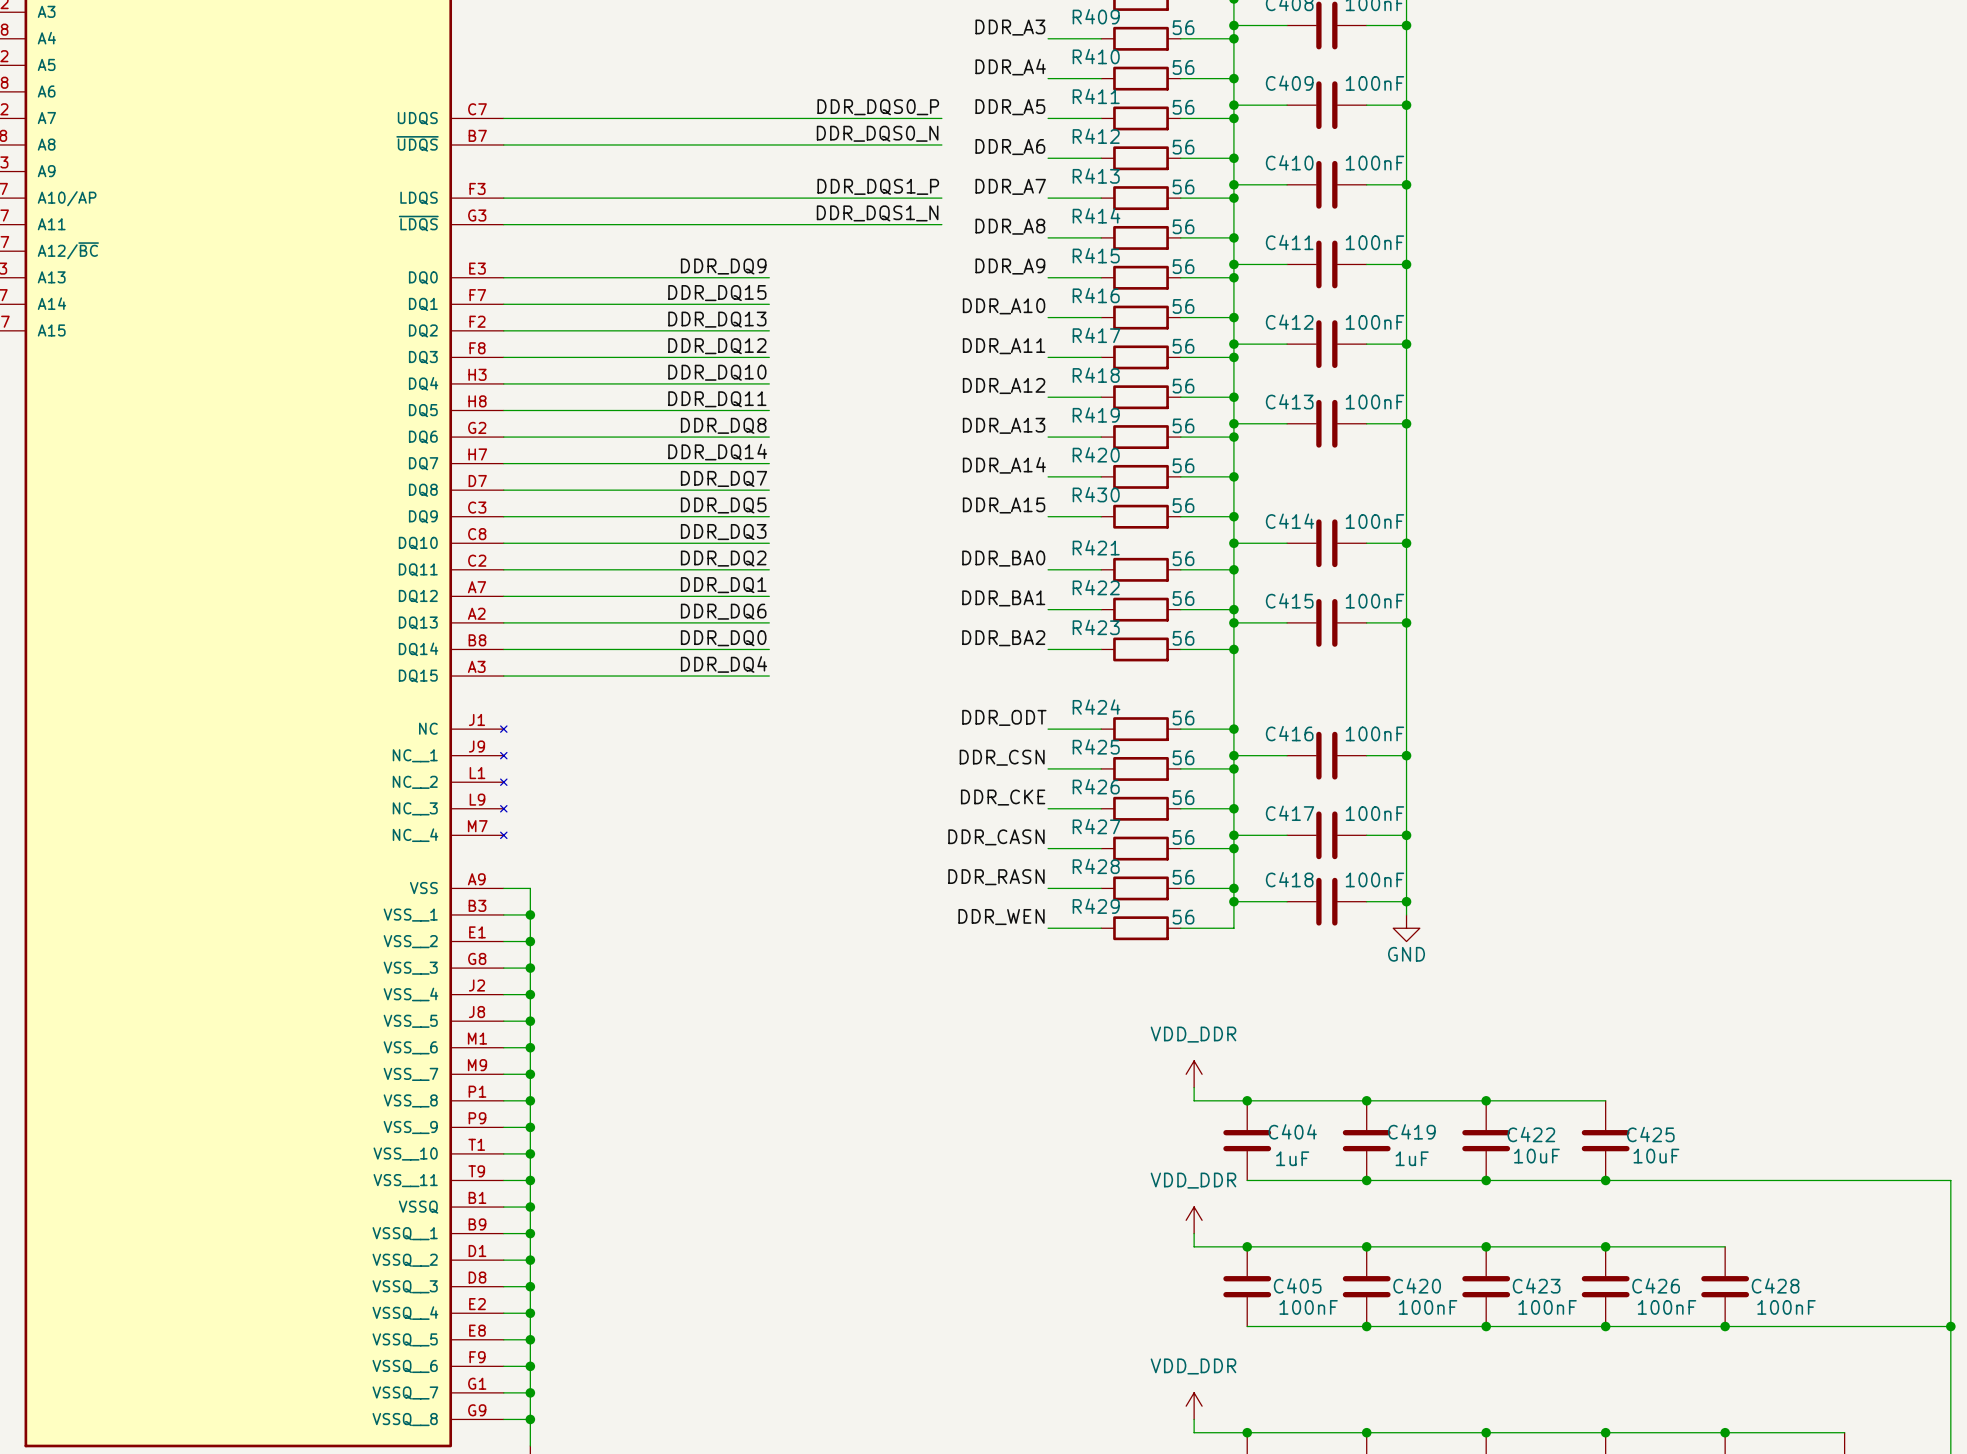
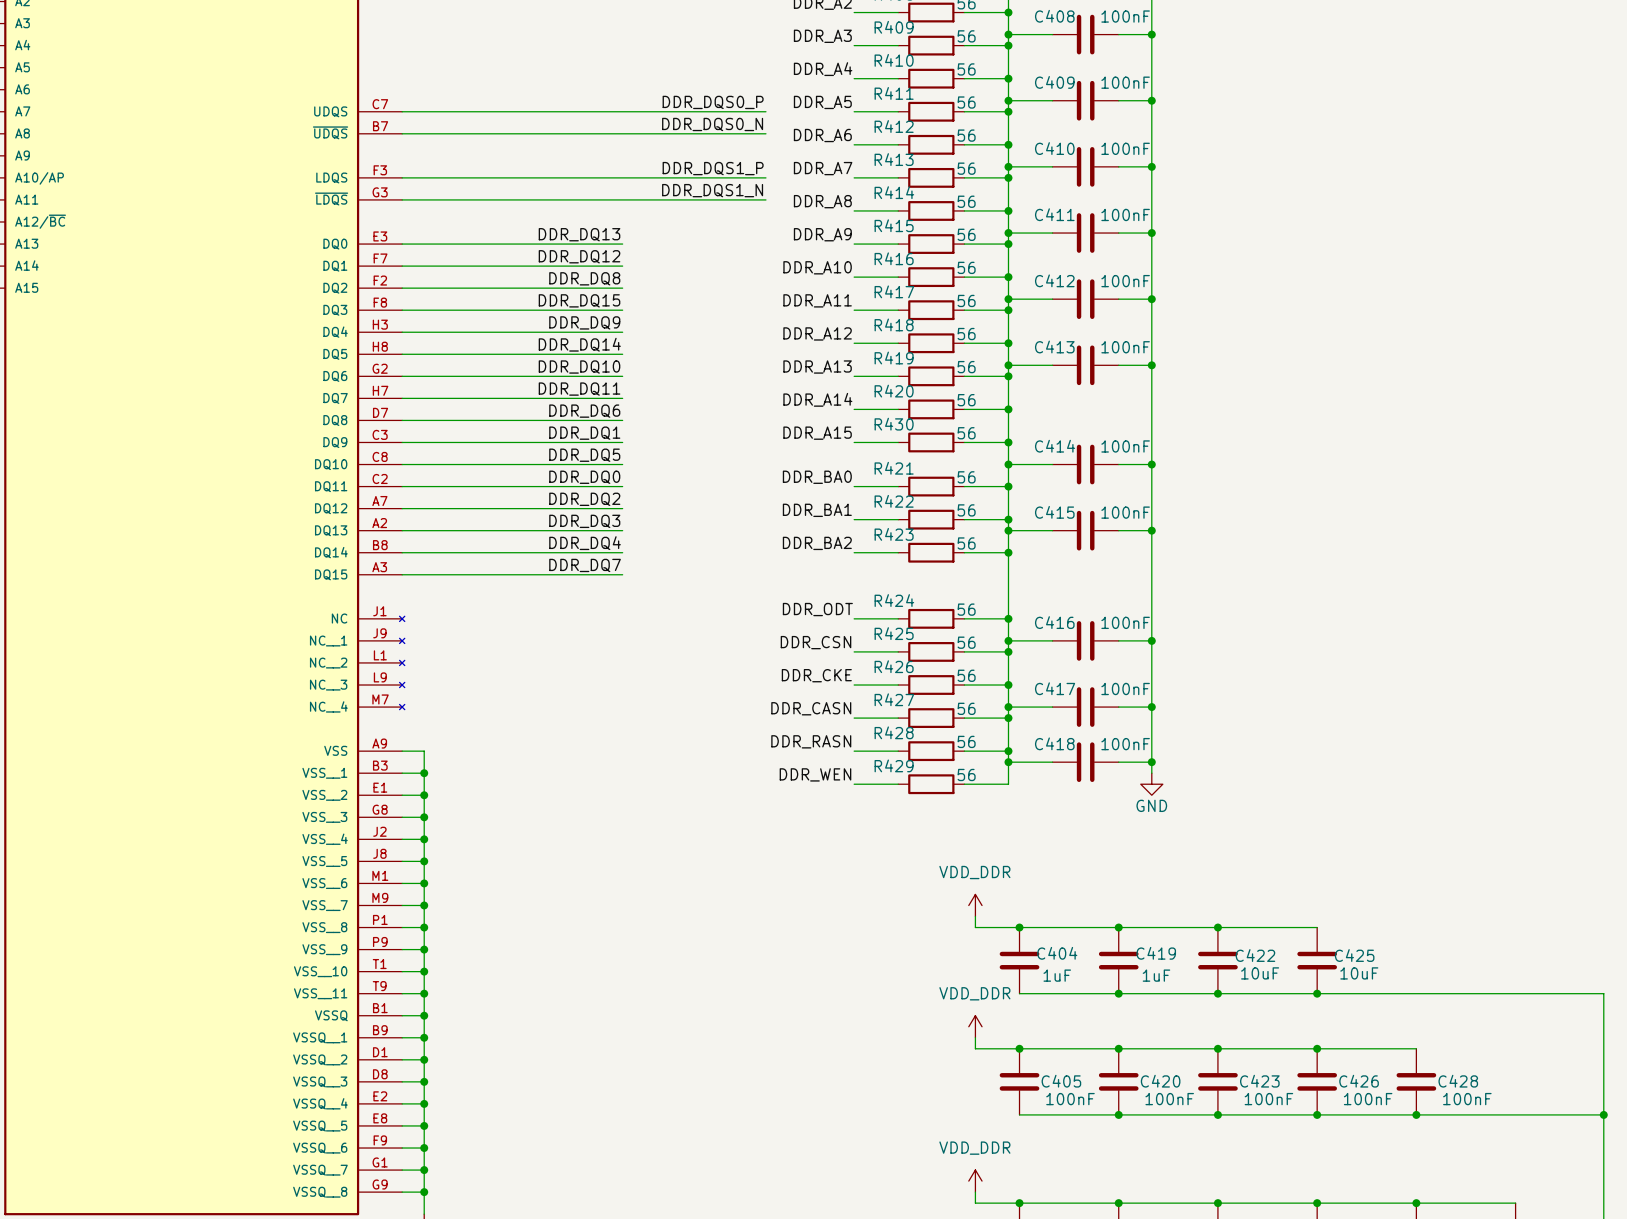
label: DDR_DQ9 (723, 266) -> DDR_DQ13 (579, 234)
label: DDR_DQ15 (717, 293) -> DDR_DQ12 (579, 256)
label: DDR_DQ13 (717, 319) -> DDR_DQ8 (584, 278)
label: DDR_DQ12 (717, 346) -> DDR_DQ15 (579, 300)
label: DDR_DQ10 (717, 372) -> DDR_DQ9 (584, 322)
label: DDR_DQ11 (717, 399) -> DDR_DQ14 (579, 344)
label: DDR_DQ8 (723, 425) -> DDR_DQ10 (579, 367)
label: DDR_DQ14 (717, 452) -> DDR_DQ11 (579, 389)
label: DDR_DQ7 (724, 478) -> DDR_DQ6 (584, 411)
label: DDR_DQ5 (723, 505) -> DDR_DQ1 (584, 433)
label: DDR_DQ3 (723, 532) -> DDR_DQ5 (584, 455)
label: DDR_DQ2 (723, 558) -> DDR_DQ0 (584, 477)
label: DDR_DQ1 (723, 585) -> DDR_DQ2 (584, 499)
label: DDR_DQ6 (723, 611) -> DDR_DQ3 (584, 521)
label: DDR_DQ0 (723, 638) -> DDR_DQ4 (585, 543)
label: DDR_DQ4 (724, 664) -> DDR_DQ7 (585, 565)

